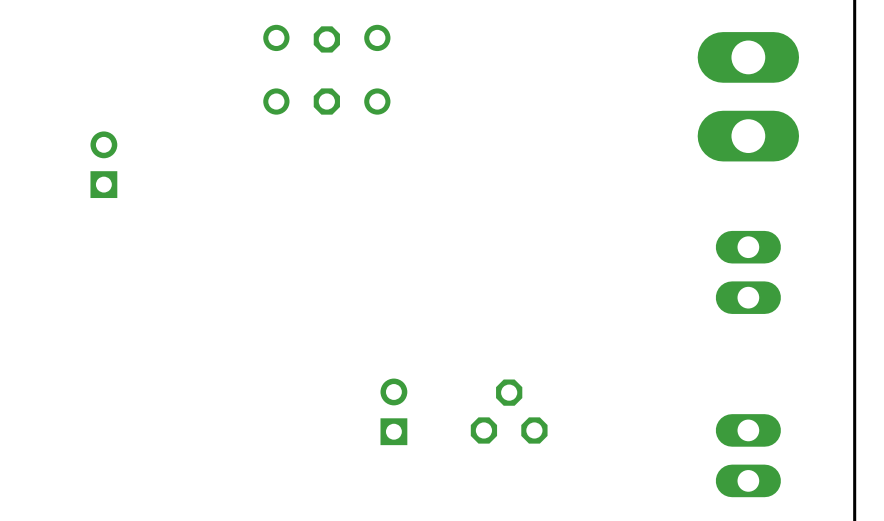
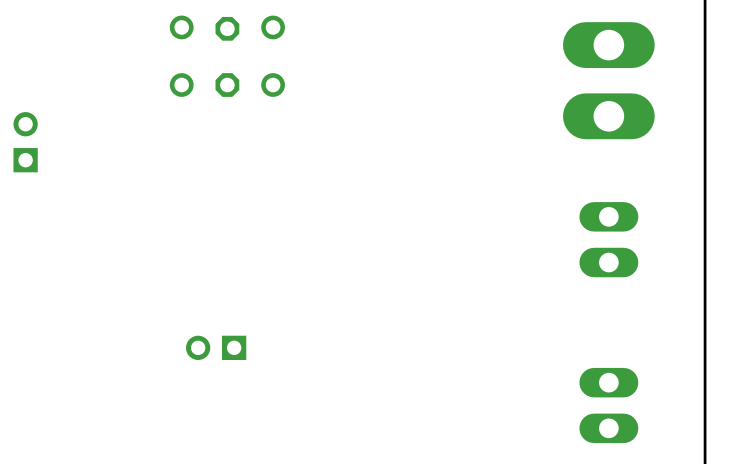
part rotation: 0° (393, 411) -> 90° counterclockwise (216, 347)
part position: (393, 411) -> (216, 347)
part: (509, 411) -> none

